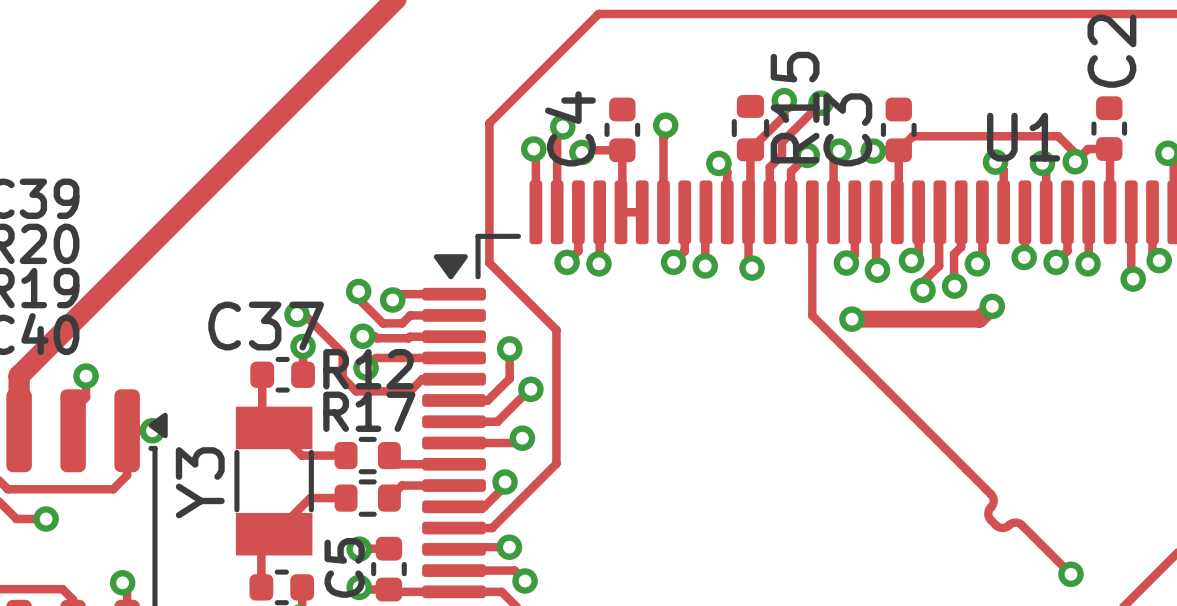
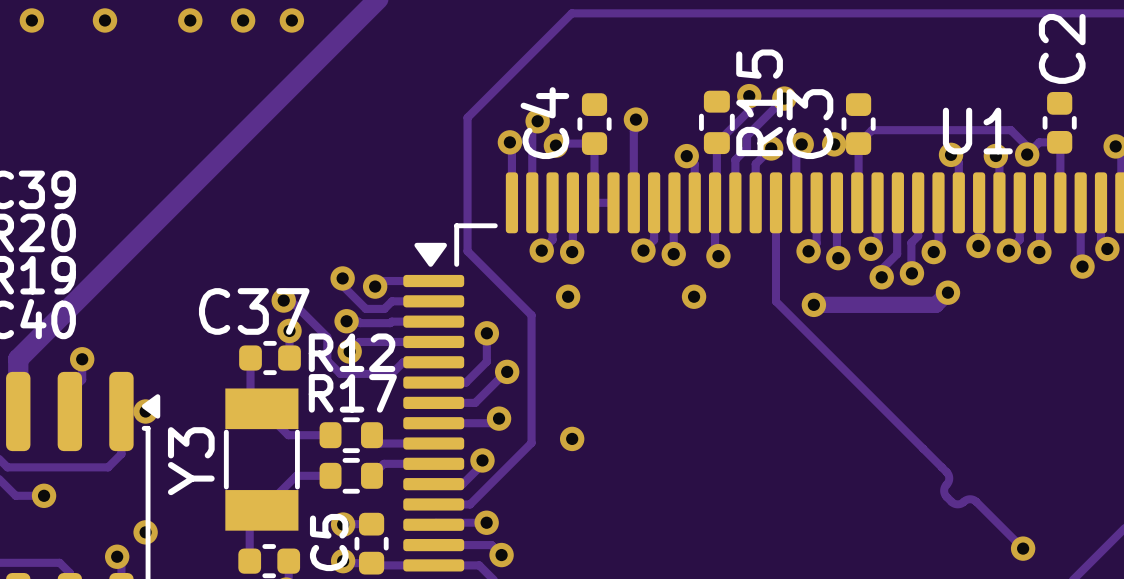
via: none -> (31, 20)
via: none -> (104, 20)
via: none -> (190, 20)
via: none -> (243, 20)
via: none -> (291, 20)
via: none -> (568, 296)
via: none -> (694, 296)
via: none -> (572, 438)
via: none -> (145, 532)

